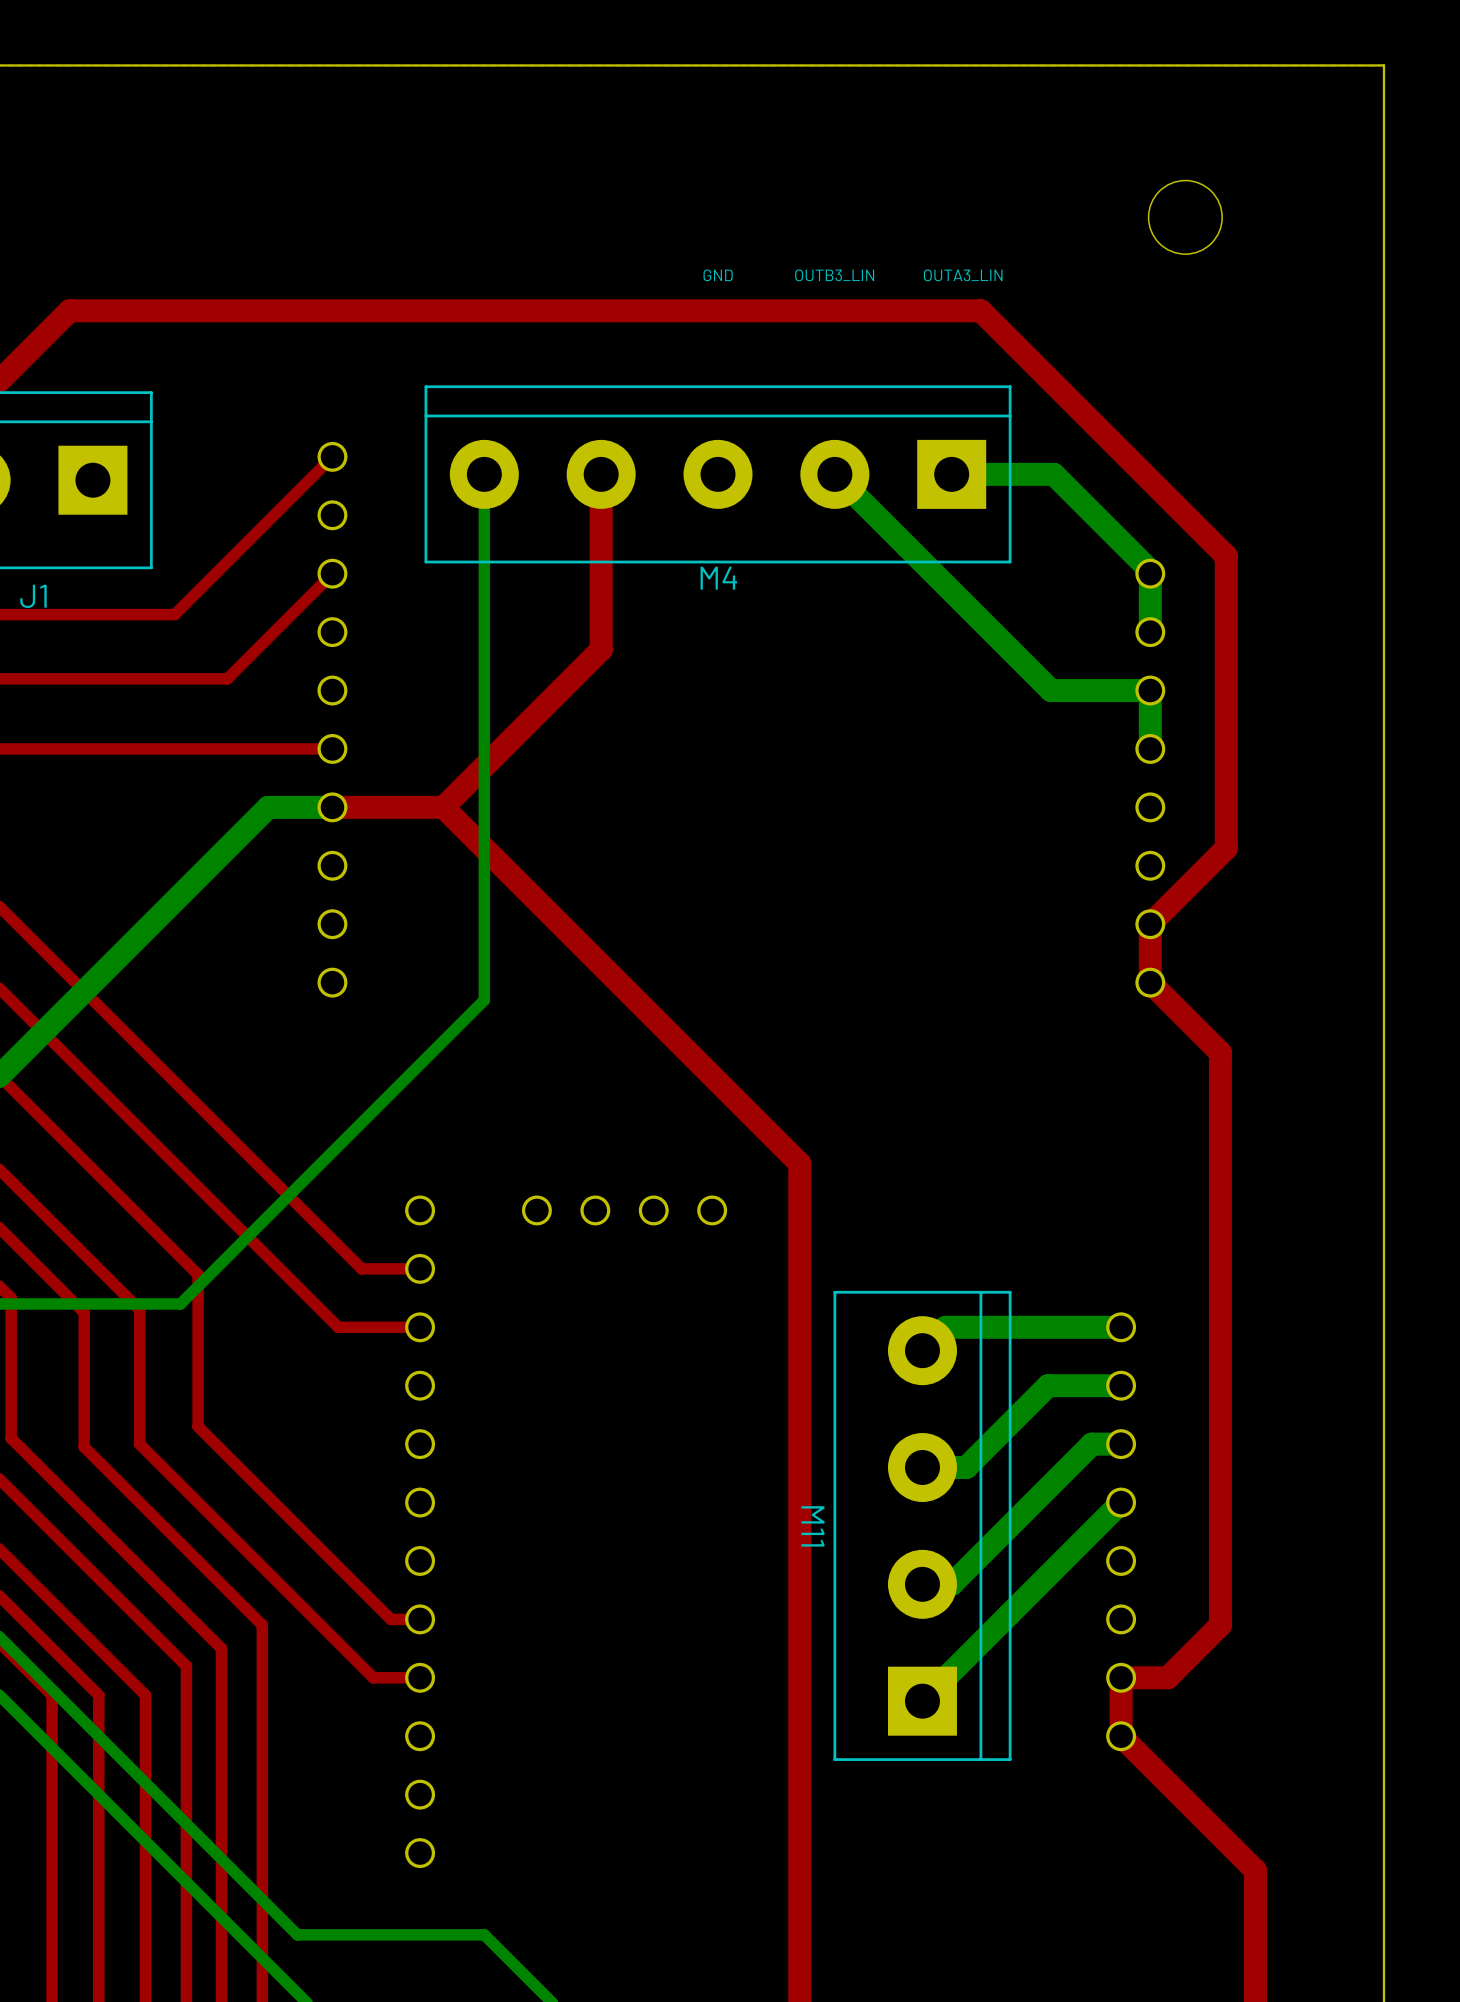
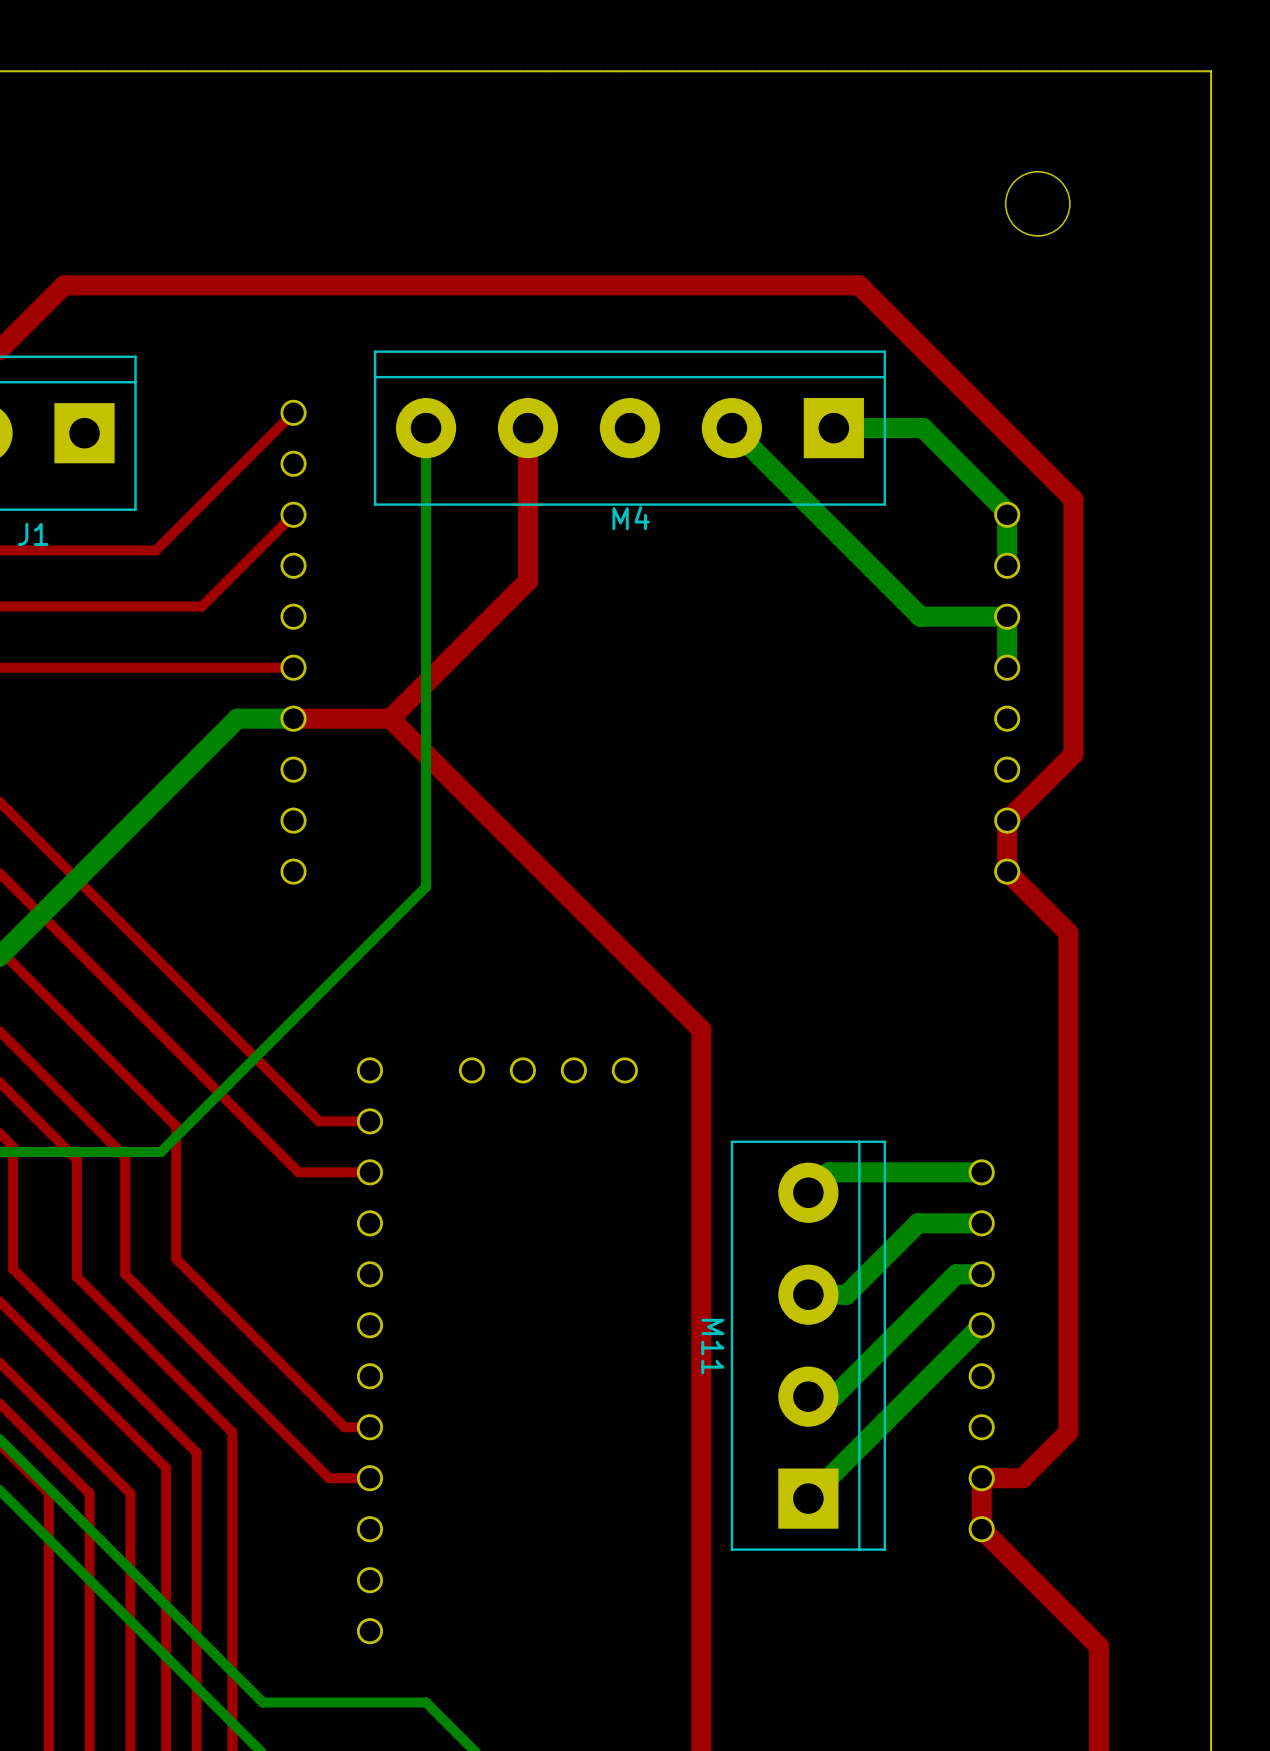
text: GND (718, 275) -> none
text: OUTB3_LIN (834, 275) -> none
text: OUTA3_LIN (963, 275) -> none

